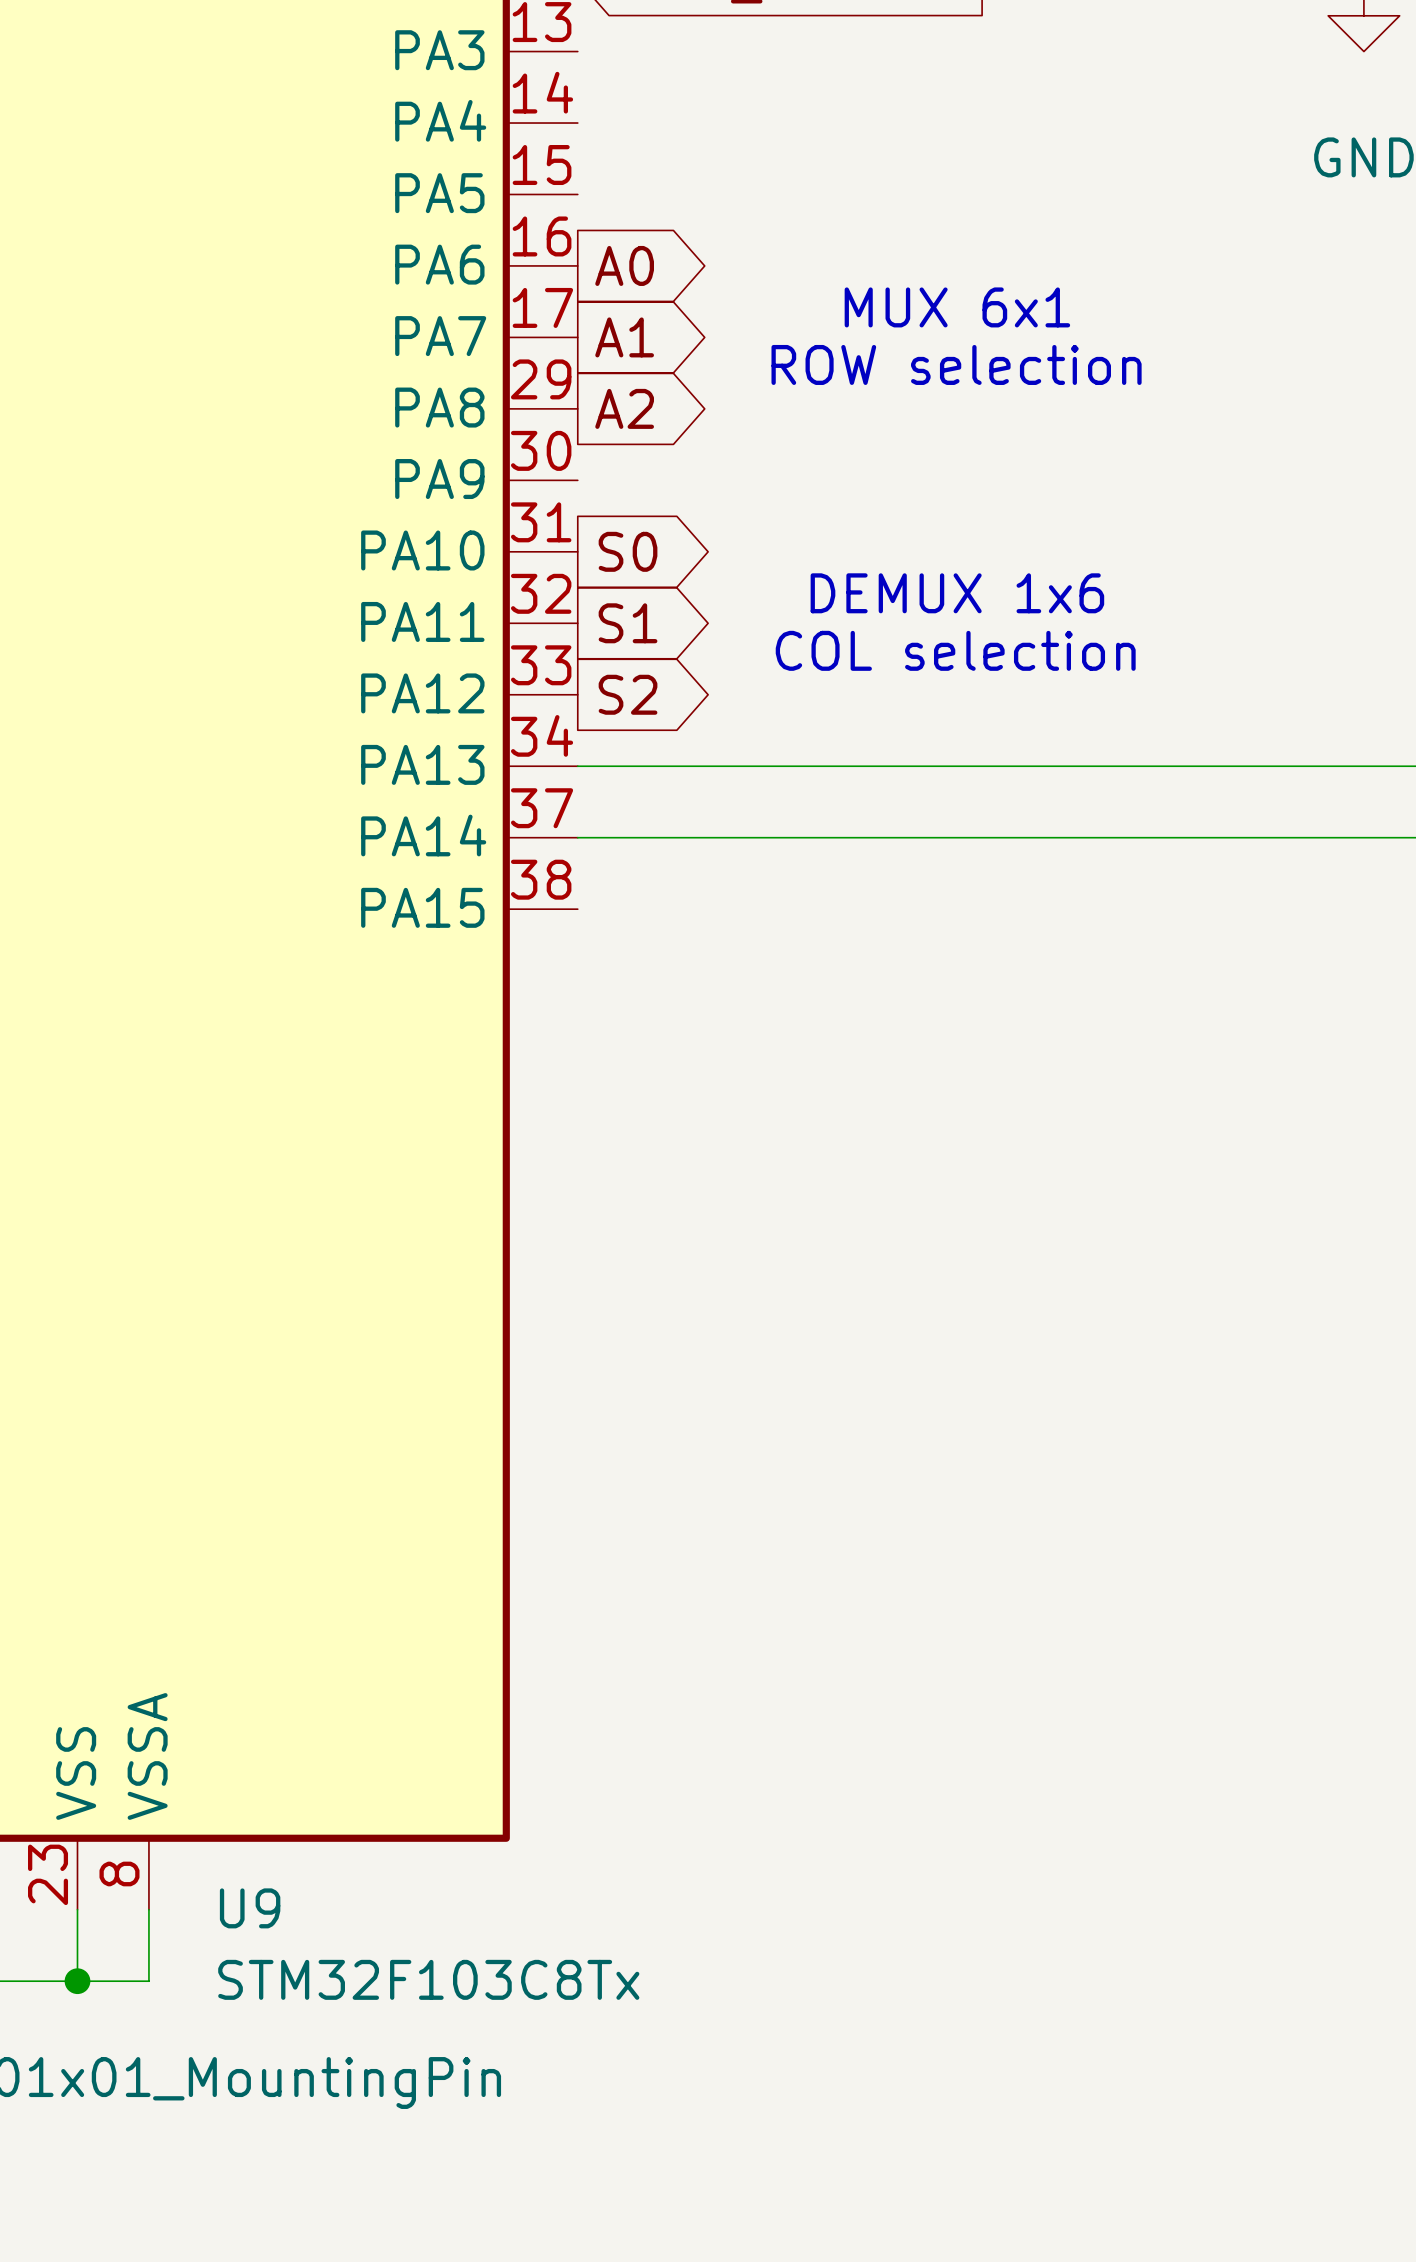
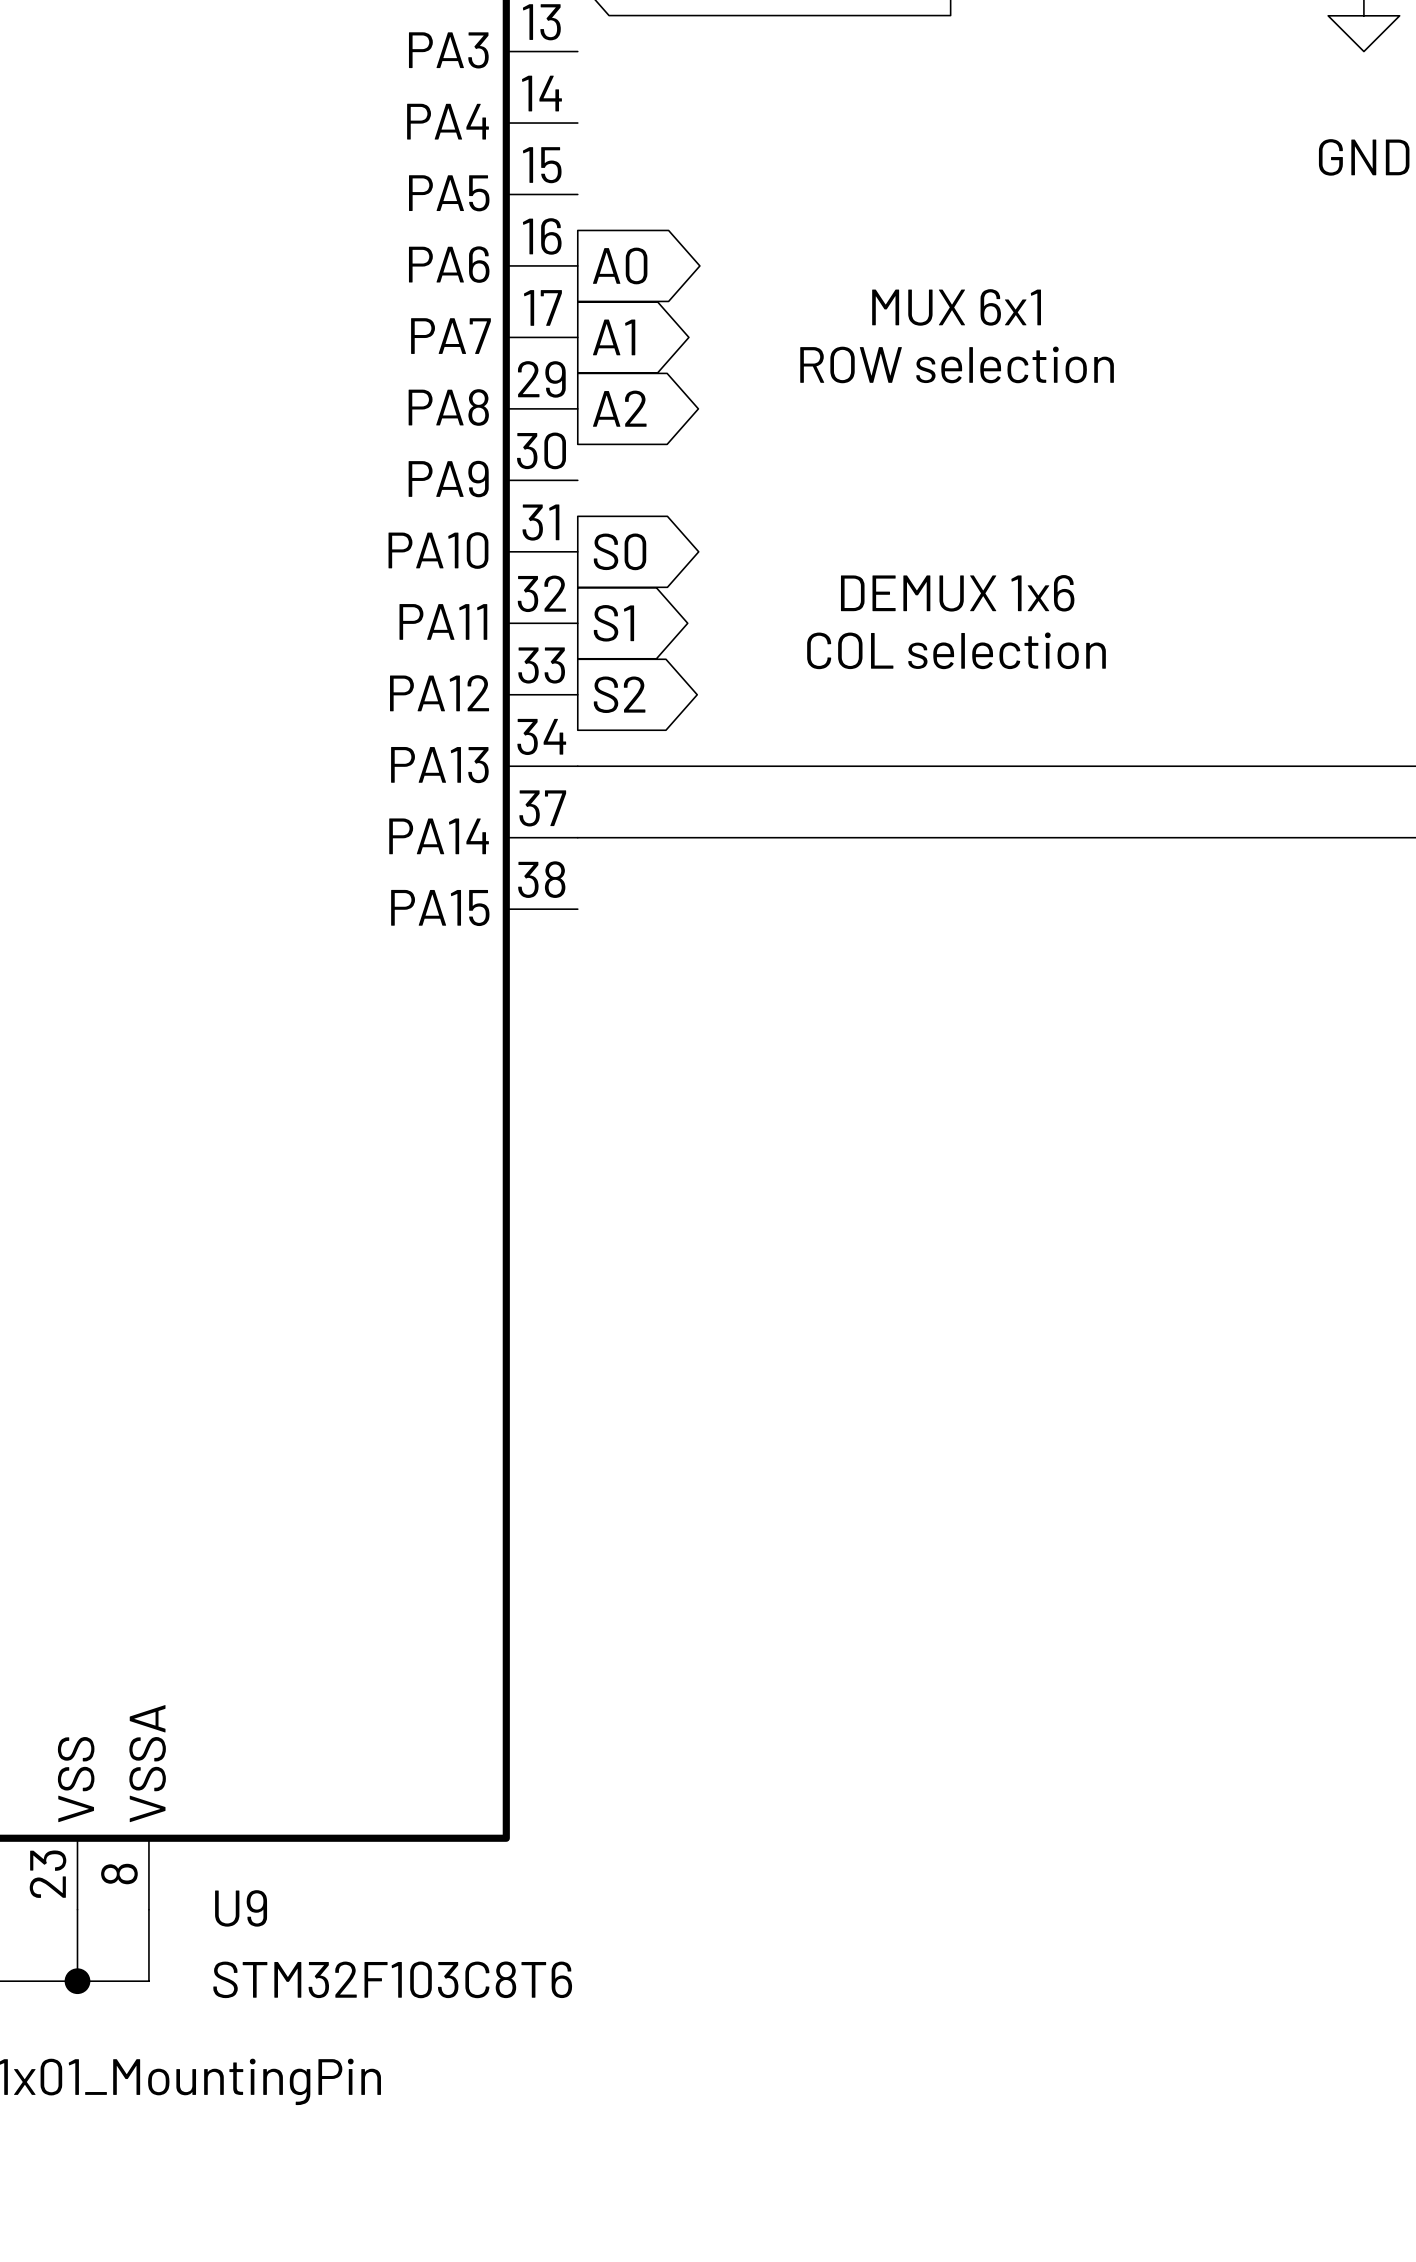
U9 value: STM32F103C8Tx (428, 1979) -> STM32F103C8T6 (392, 1979)

